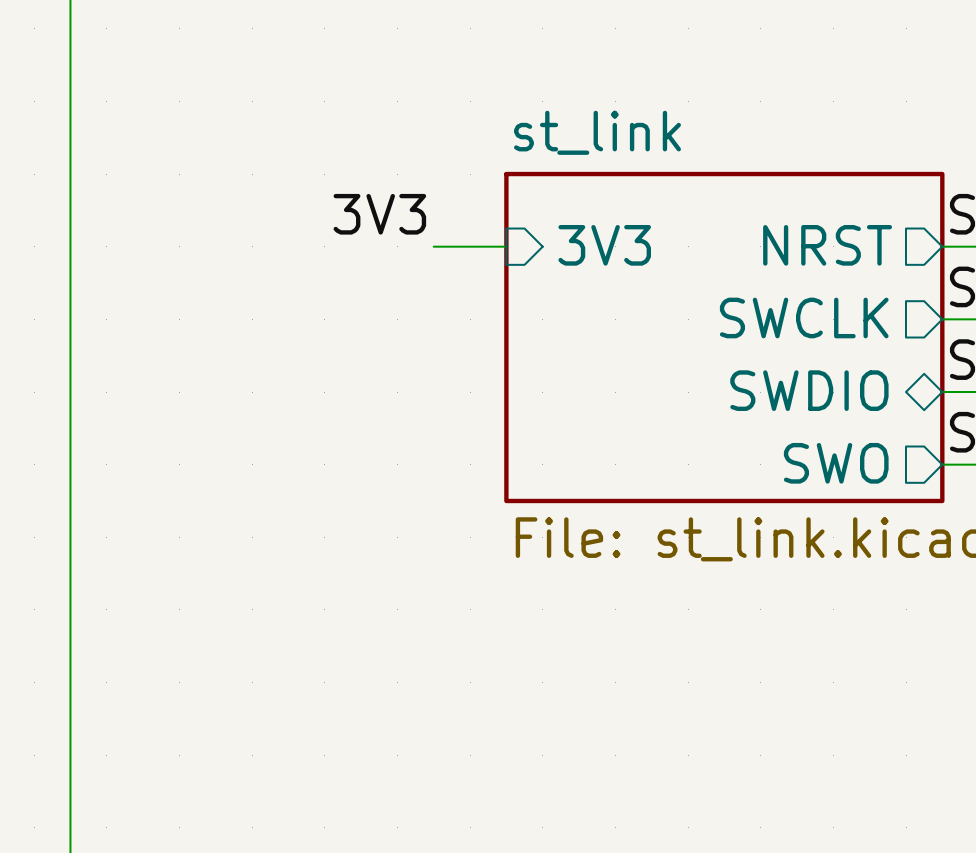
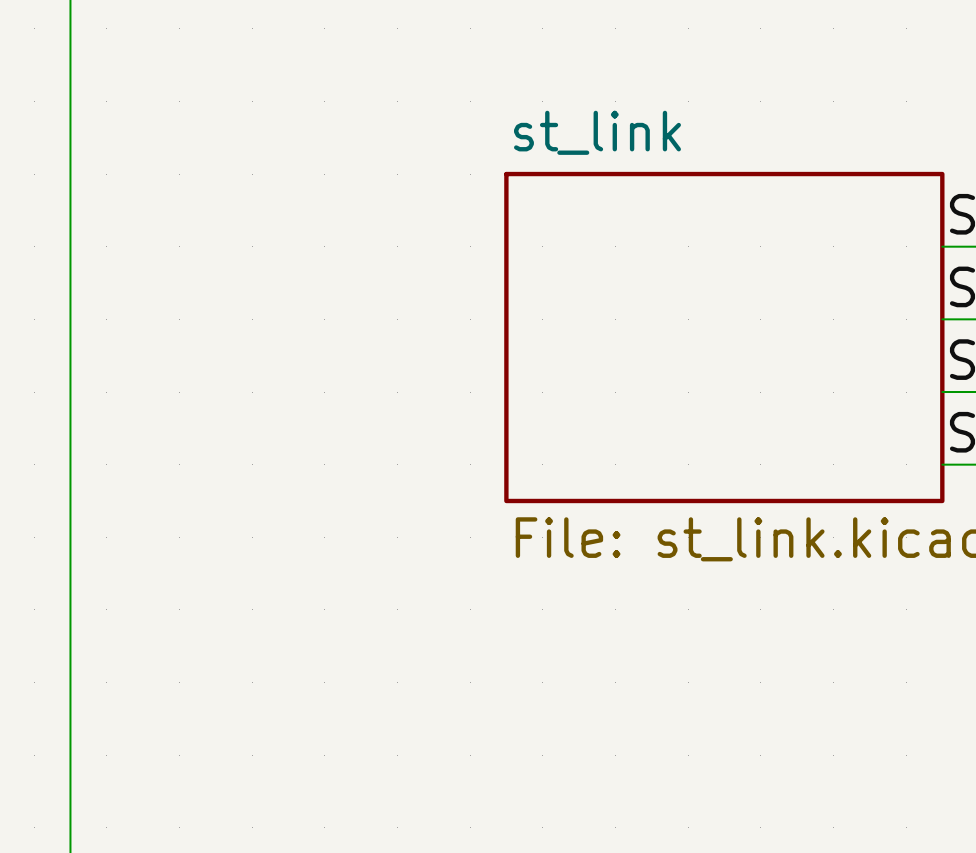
label: 3V3 (379, 214) -> none
sheet pin: 3V3 (604, 245) -> none
sheet pin: NRST (827, 245) -> none
wire: (433, 246) (506, 246) -> none
sheet pin: SWCLK (804, 317) -> none
sheet pin: SWDIO (809, 390) -> none
sheet pin: SWO (836, 463) -> none

